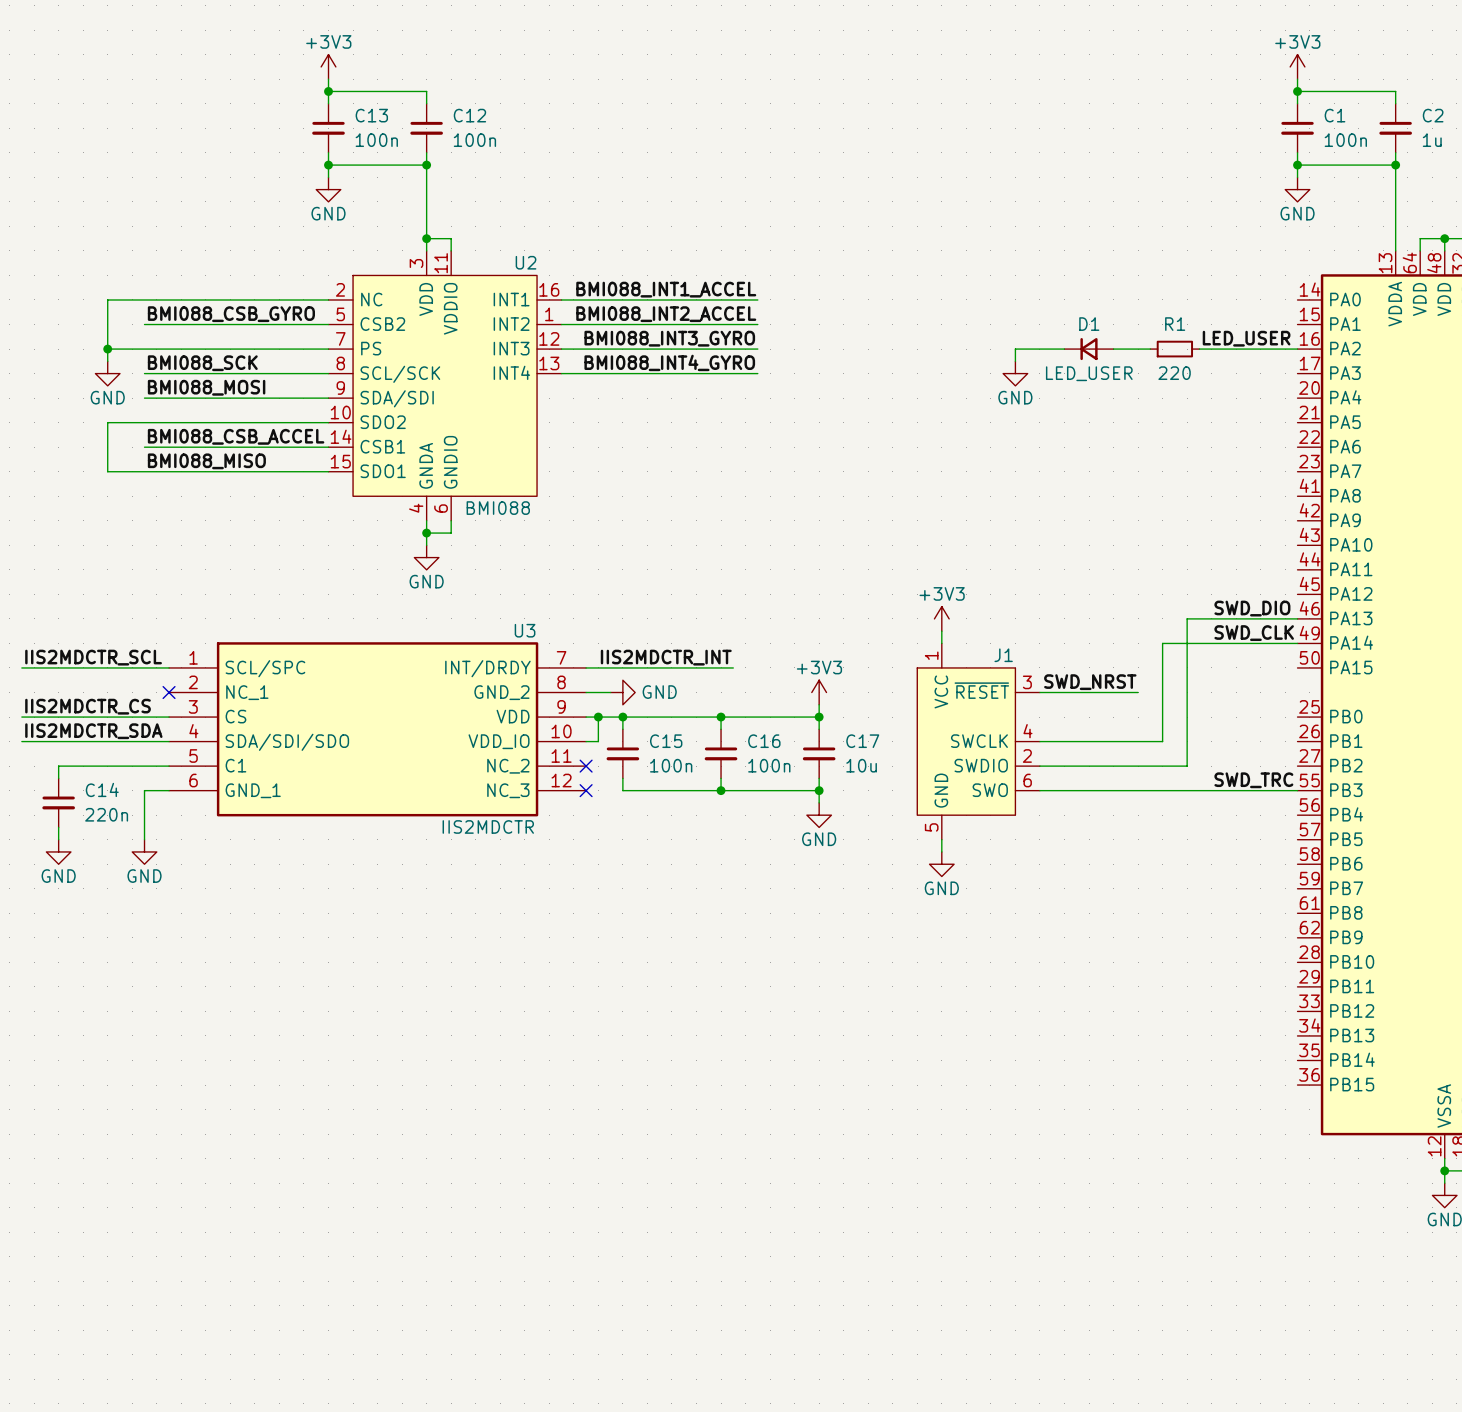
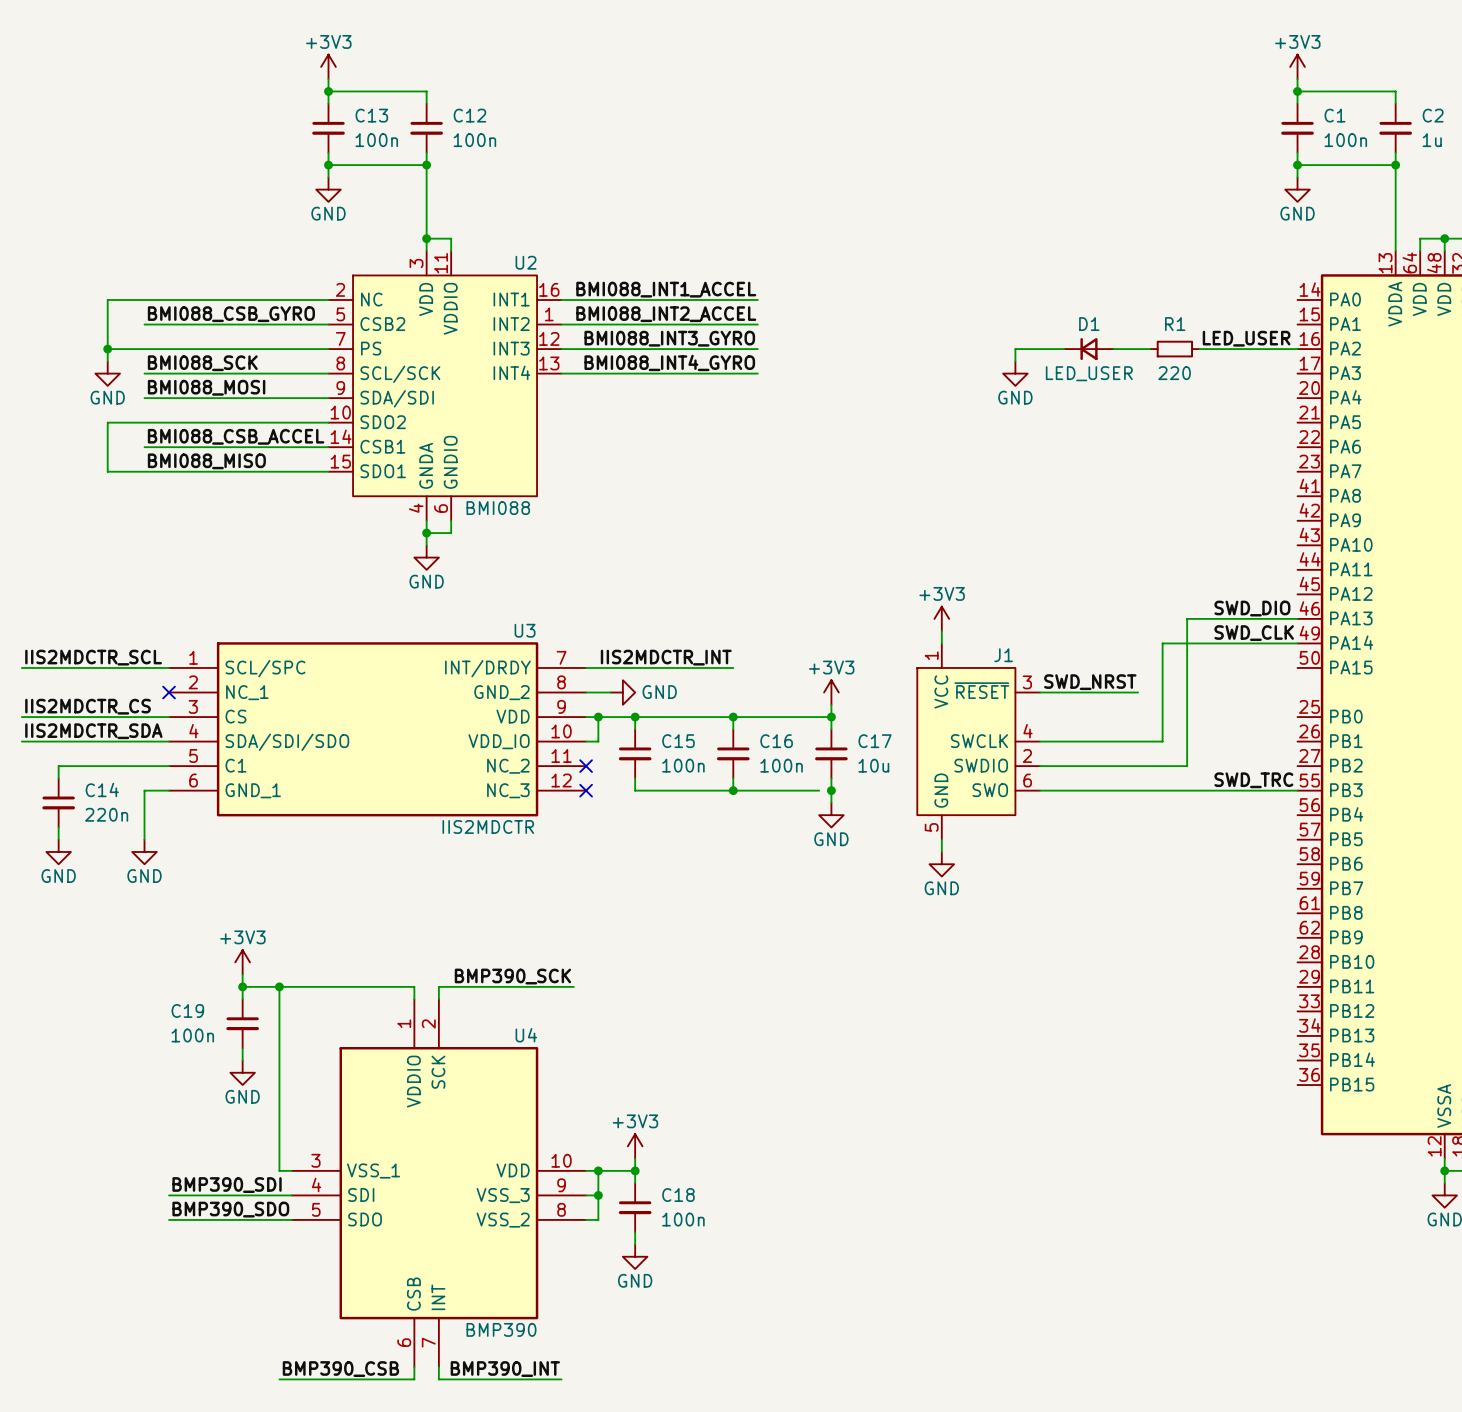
power symbol position: +3V3 (819, 692) -> +3V3 (831, 692)
wire: (819, 704) (819, 729) -> (831, 704) (831, 729)
wire: (622, 717) (622, 729) -> (635, 717) (635, 729)
junction position: (622, 717) -> (635, 717)
wire: (721, 717) (721, 729) -> (733, 717) (733, 729)
junction position: (721, 717) -> (733, 717)
wire: none -> (819, 717) (831, 717)
junction position: (819, 717) -> (831, 717)
C15 position: (622, 753) -> (635, 753)
C16 position: (721, 753) -> (733, 753)
C17 position: (819, 753) -> (831, 753)
wire: (622, 778) (622, 790) (635, 790) -> (635, 778) (635, 790)
wire: (721, 778) (721, 790) -> (733, 778) (733, 790)
wire: (819, 778) (819, 802) -> (831, 778) (831, 802)
junction position: (721, 790) -> (733, 790)
junction position: (819, 790) -> (831, 790)
power symbol position: GND (819, 815) -> GND (831, 815)
power symbol: none -> +3V3 (242, 962)
wire: none -> (242, 974) (242, 999)
label: none -> BMP390_SCK (512, 976)
wire: none -> (242, 986) (414, 986) (414, 999)
junction: none -> (242, 986)
wire: none -> (279, 986) (279, 1170) (291, 1170)
junction: none -> (279, 986)
wire: none -> (573, 986) (438, 986) (438, 999)
C19: none -> 100n (242, 1023)
wire: none -> (242, 1048) (242, 1060)
power symbol: none -> GND (242, 1072)
power symbol: none -> +3V3 (635, 1146)
wire: none -> (635, 1158) (635, 1183)
wire: none -> (586, 1170) (635, 1170)
wire: none -> (598, 1170) (598, 1219) (586, 1219)
junction: none -> (598, 1170)
junction: none -> (635, 1170)
U4: none -> BMP390 (438, 1183)
label: none -> BMP390_SDI (227, 1185)
wire: none -> (169, 1195) (291, 1195)
wire: none -> (586, 1195) (598, 1195)
junction: none -> (598, 1195)
C18: none -> 100n (635, 1207)
label: none -> BMP390_SDO (230, 1209)
wire: none -> (169, 1219) (291, 1219)
wire: none -> (635, 1232) (635, 1244)
power symbol: none -> GND (635, 1256)
wire: none -> (414, 1367) (414, 1379) (279, 1379)
wire: none -> (438, 1367) (438, 1379) (561, 1379)
label: none -> BMP390_CSB (340, 1369)
label: none -> BMP390_INT (505, 1369)

